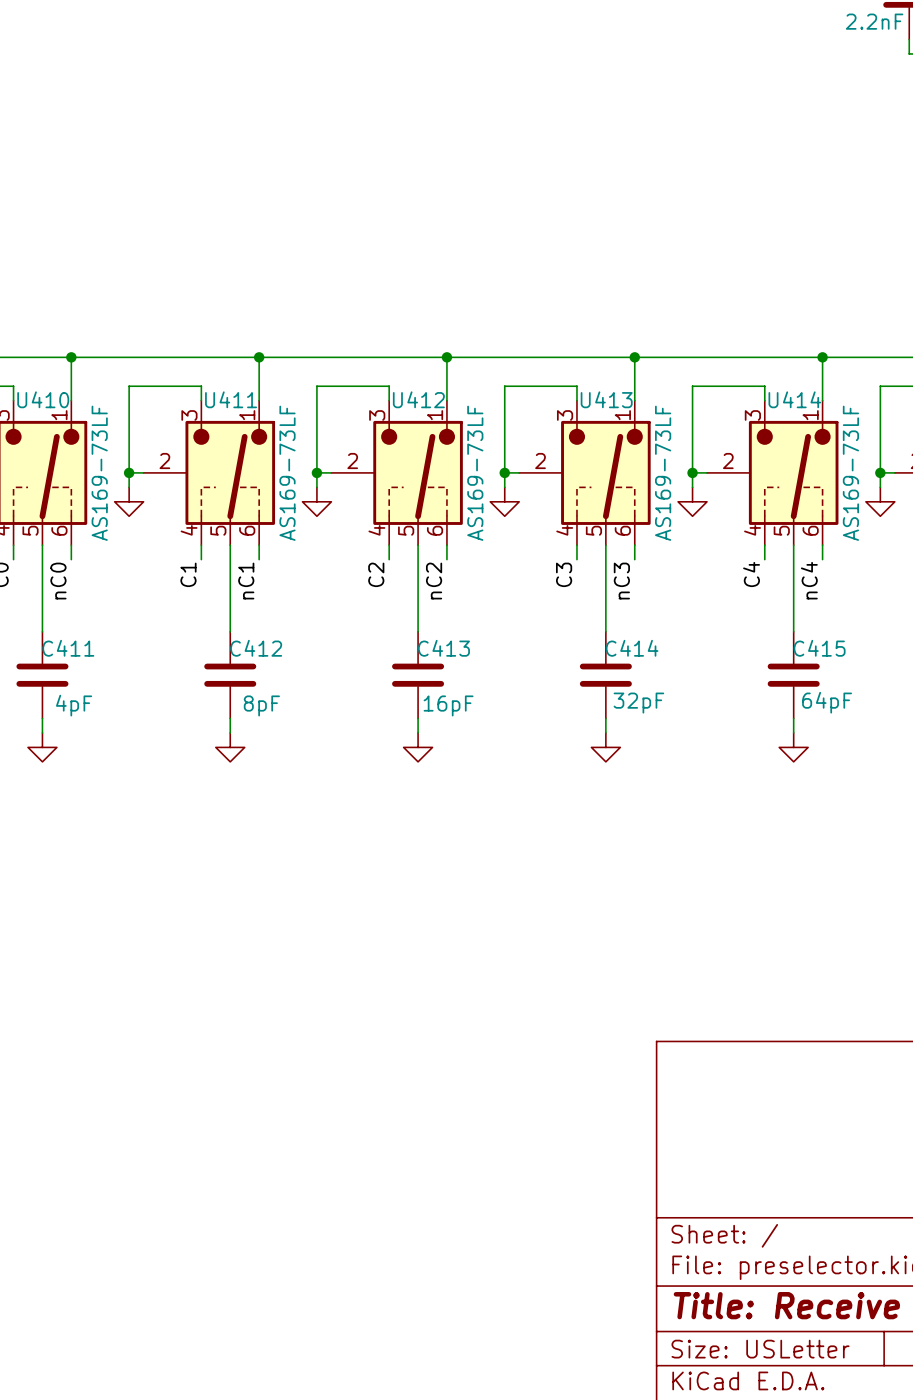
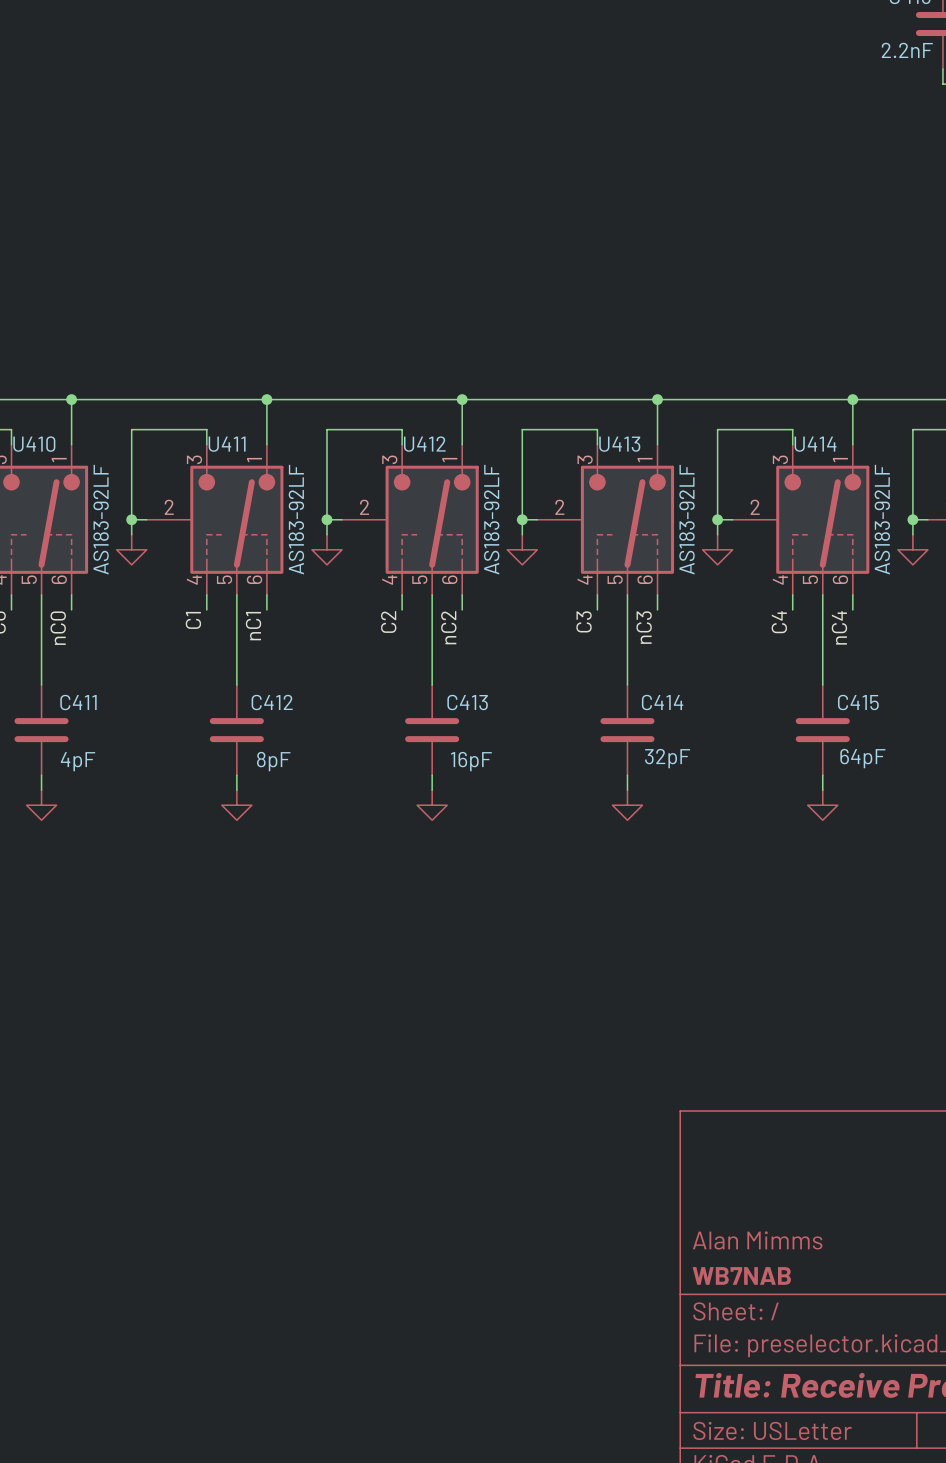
U410 value: AS169-73LF (99, 473) -> AS183-92LF (101, 519)
U411 value: AS169-73LF (287, 473) -> AS183-92LF (296, 519)
U412 value: AS169-73LF (475, 473) -> AS183-92LF (491, 519)
U413 value: AS169-73LF (663, 473) -> AS183-92LF (686, 519)
U414 value: AS169-73LF (850, 473) -> AS183-92LF (882, 519)
title block: none -> Alan Mimms (757, 1240)
title block: none -> WB7NAB (741, 1275)

